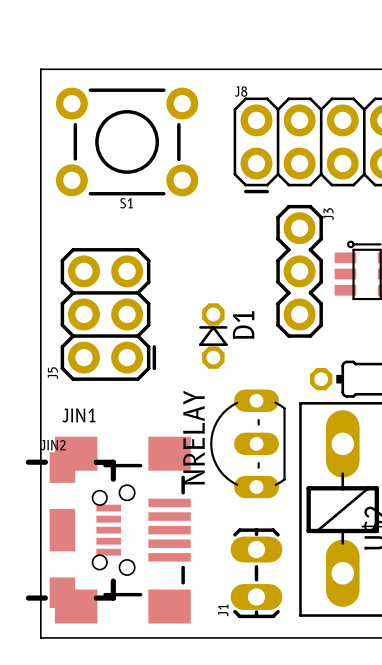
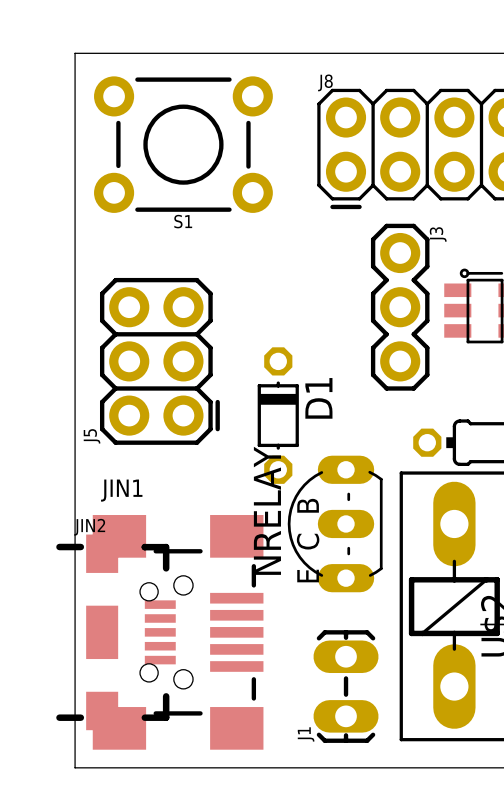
D1 footprint: [199, 303, 228, 369] -> [257, 347, 299, 484]
text: none -> E C B (308, 540)

